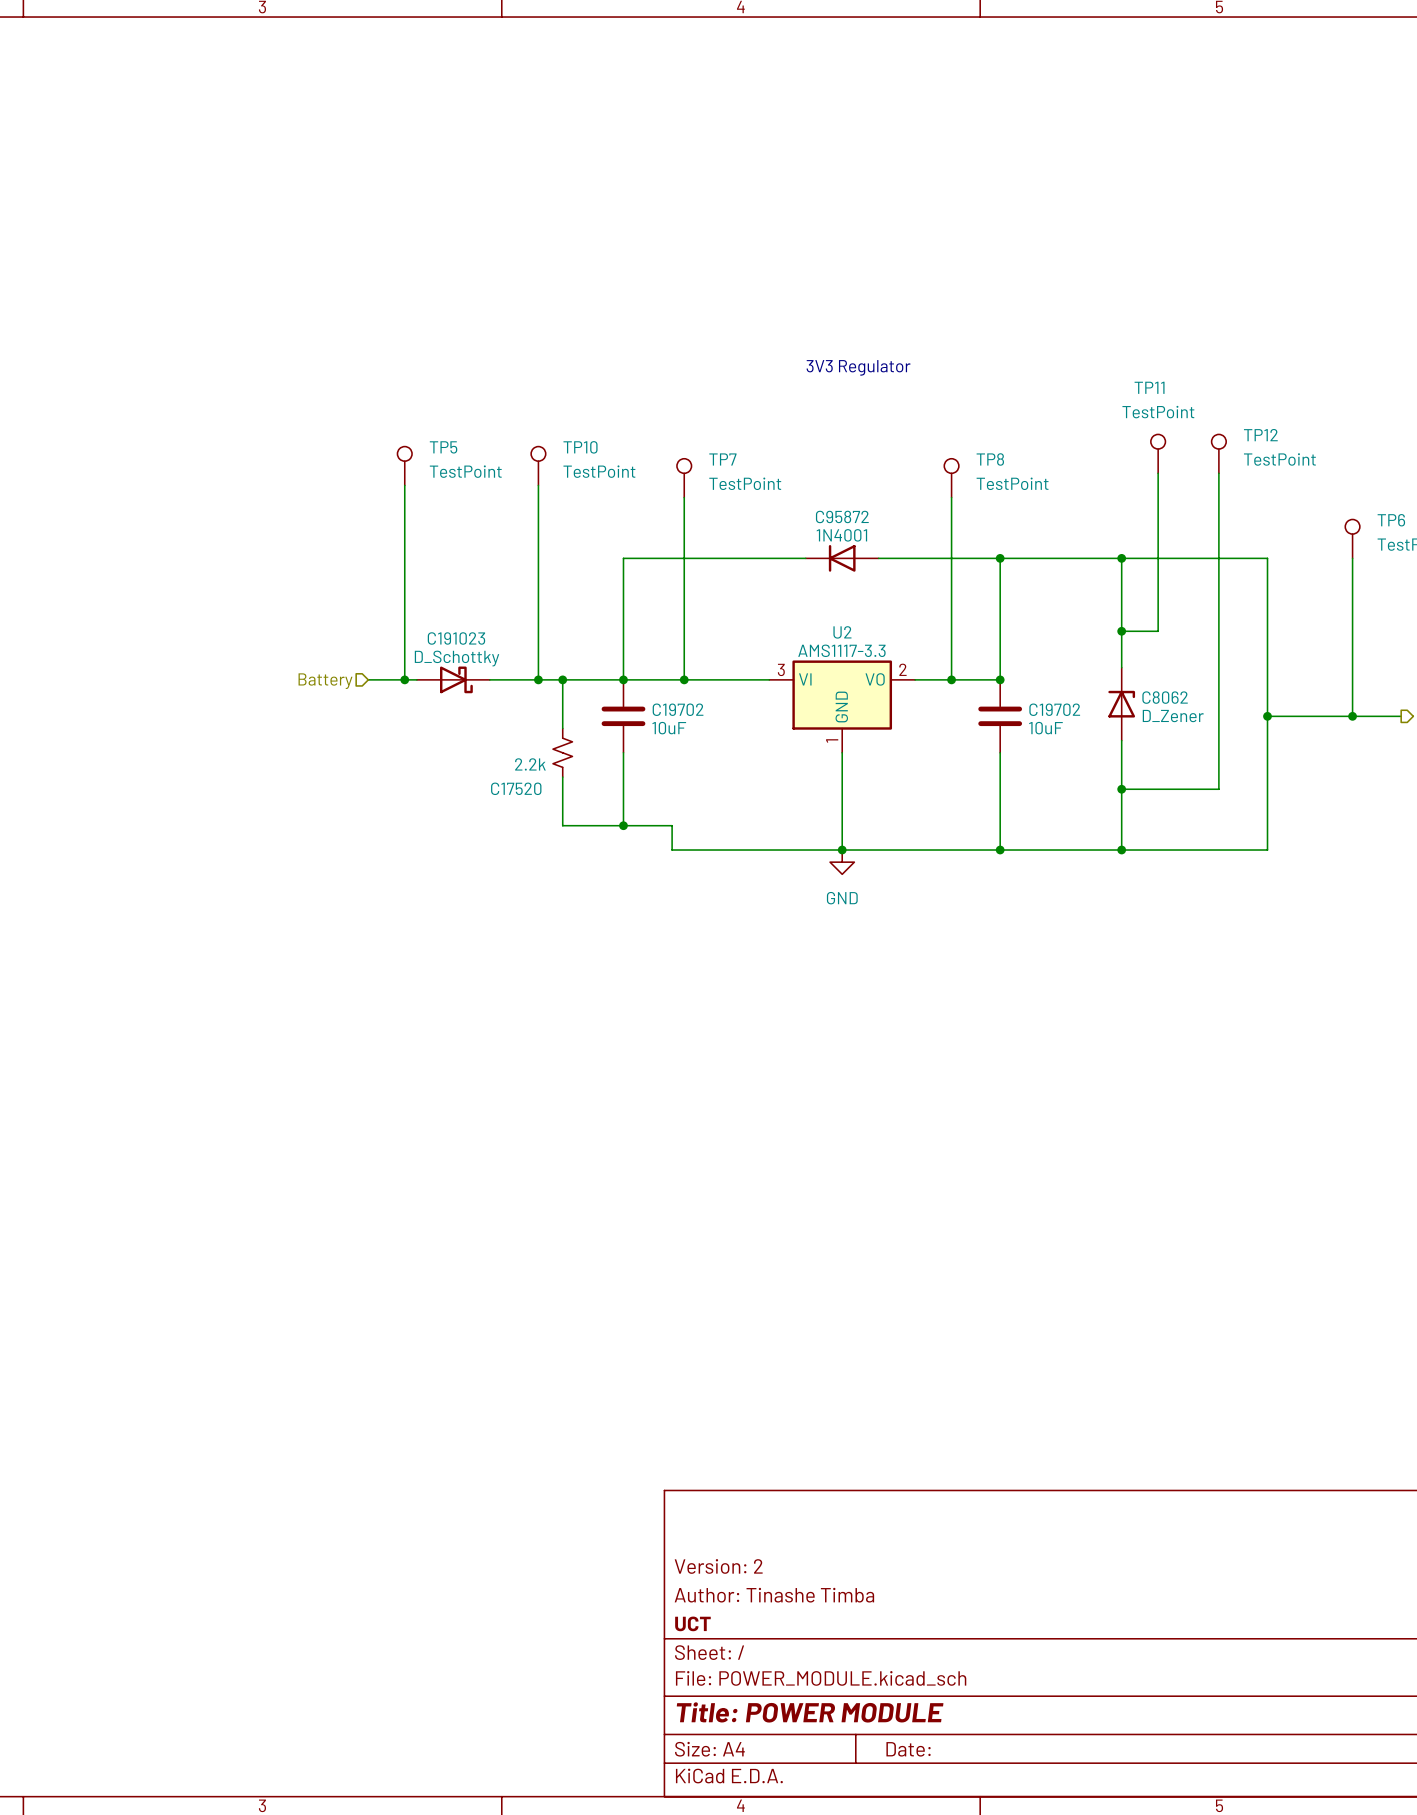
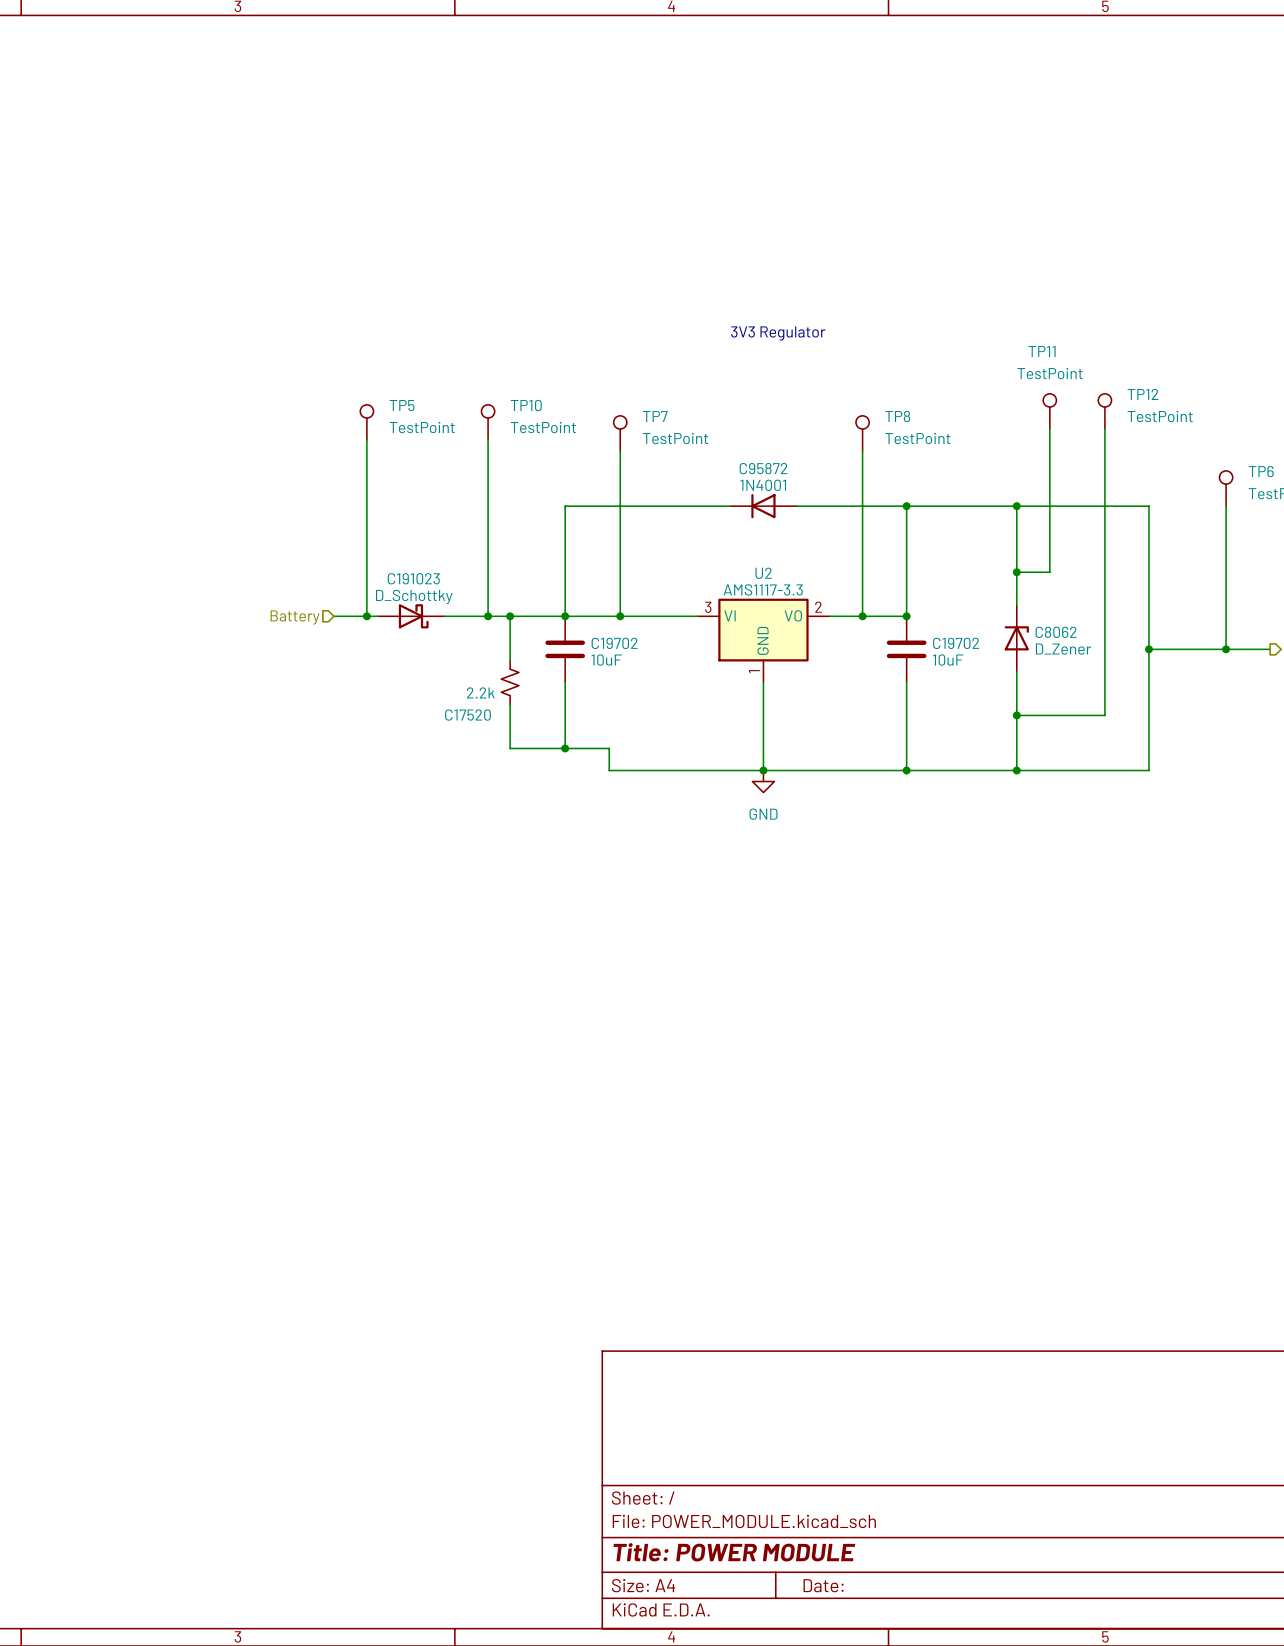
title block: Version: 2 (718, 1566) -> none
title block: Author: Tinashe Timba (774, 1595) -> none
title block: UCT (692, 1623) -> none

